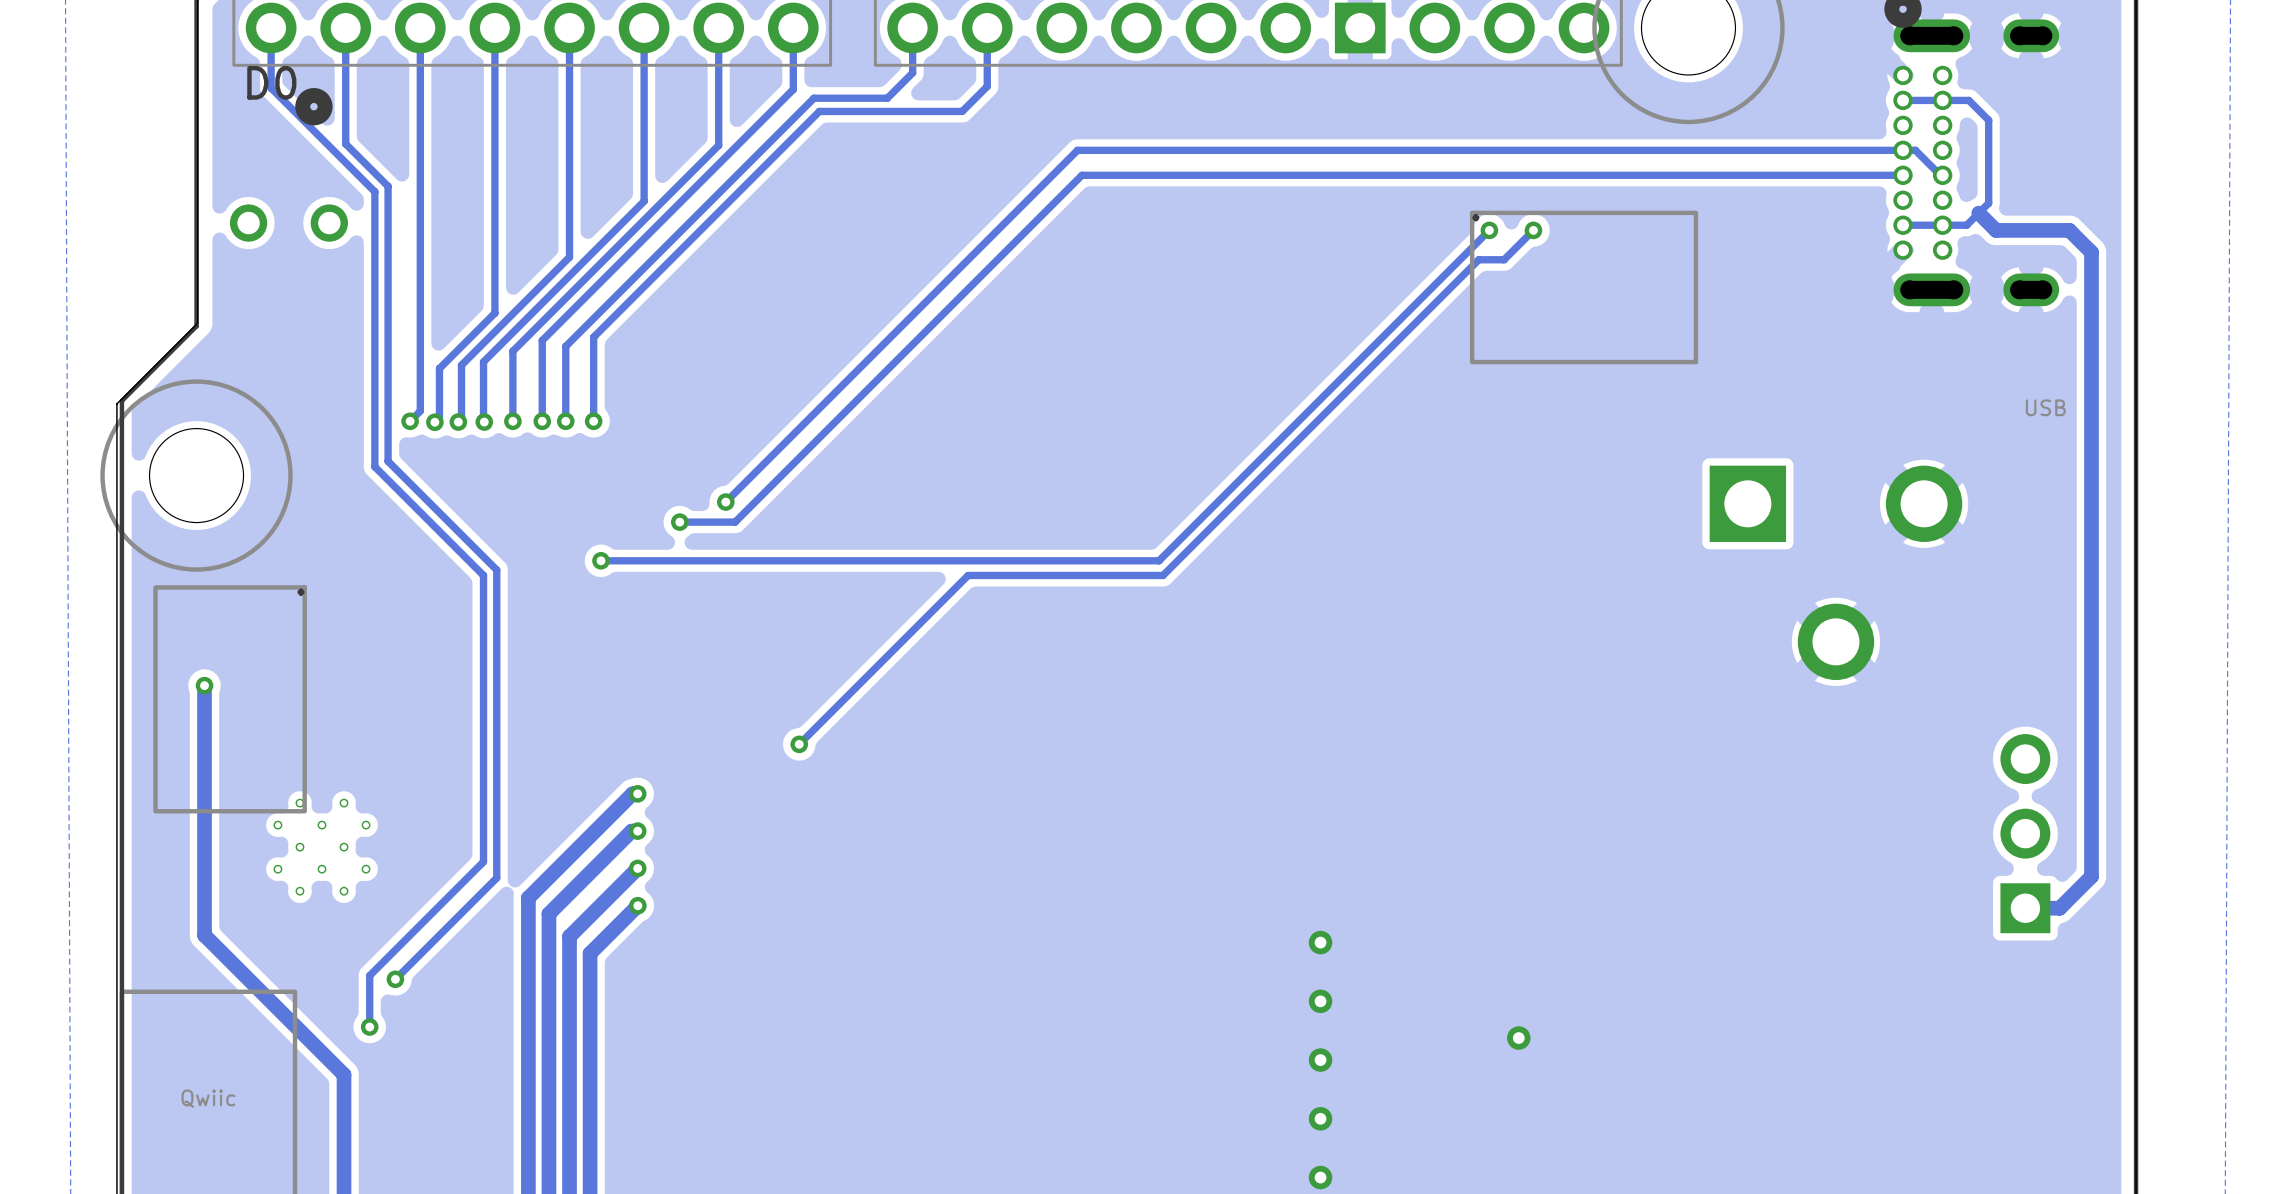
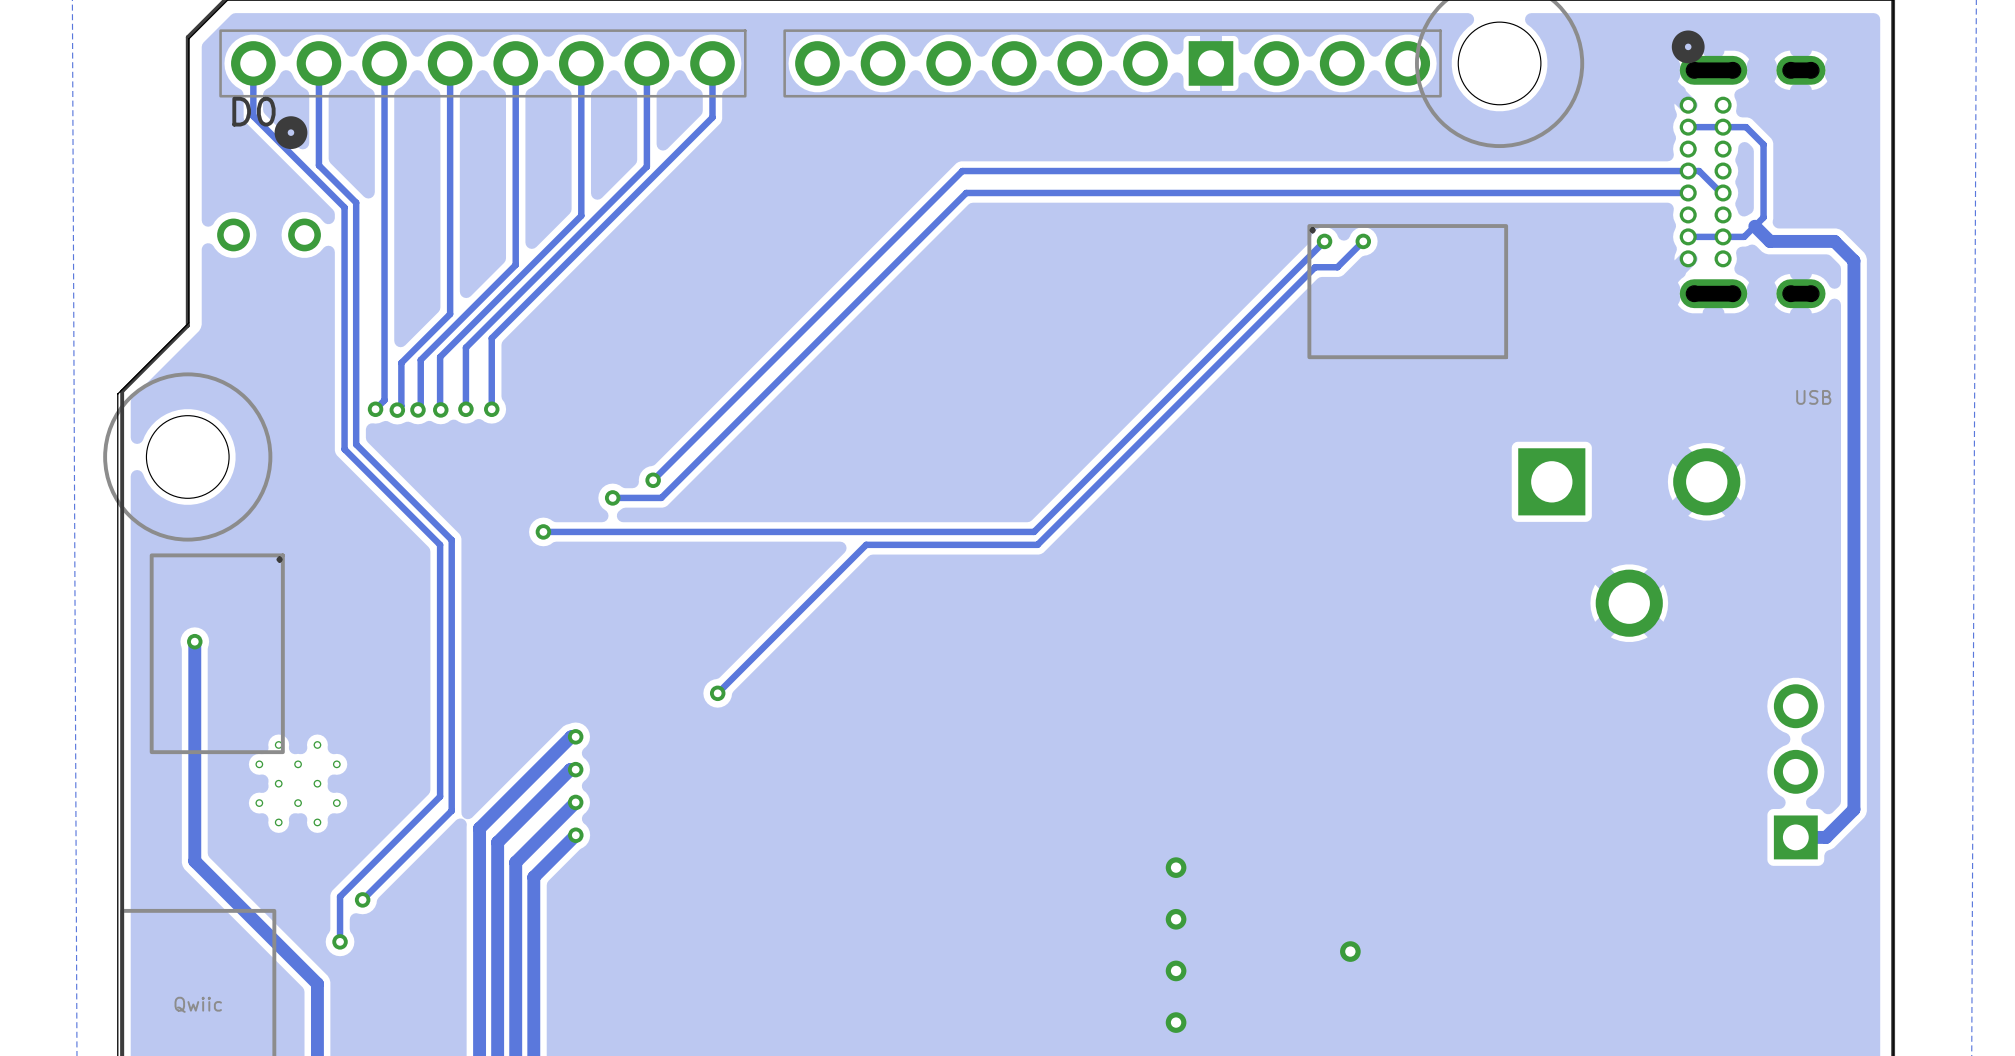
track: (912, 27) (912, 72) (887, 98) (813, 98) (565, 346) (565, 421) -> none
track: (987, 27) (987, 86) (962, 111) (819, 111) (593, 337) (593, 421) -> none
via: (565, 421) -> none
via: (593, 421) -> none

